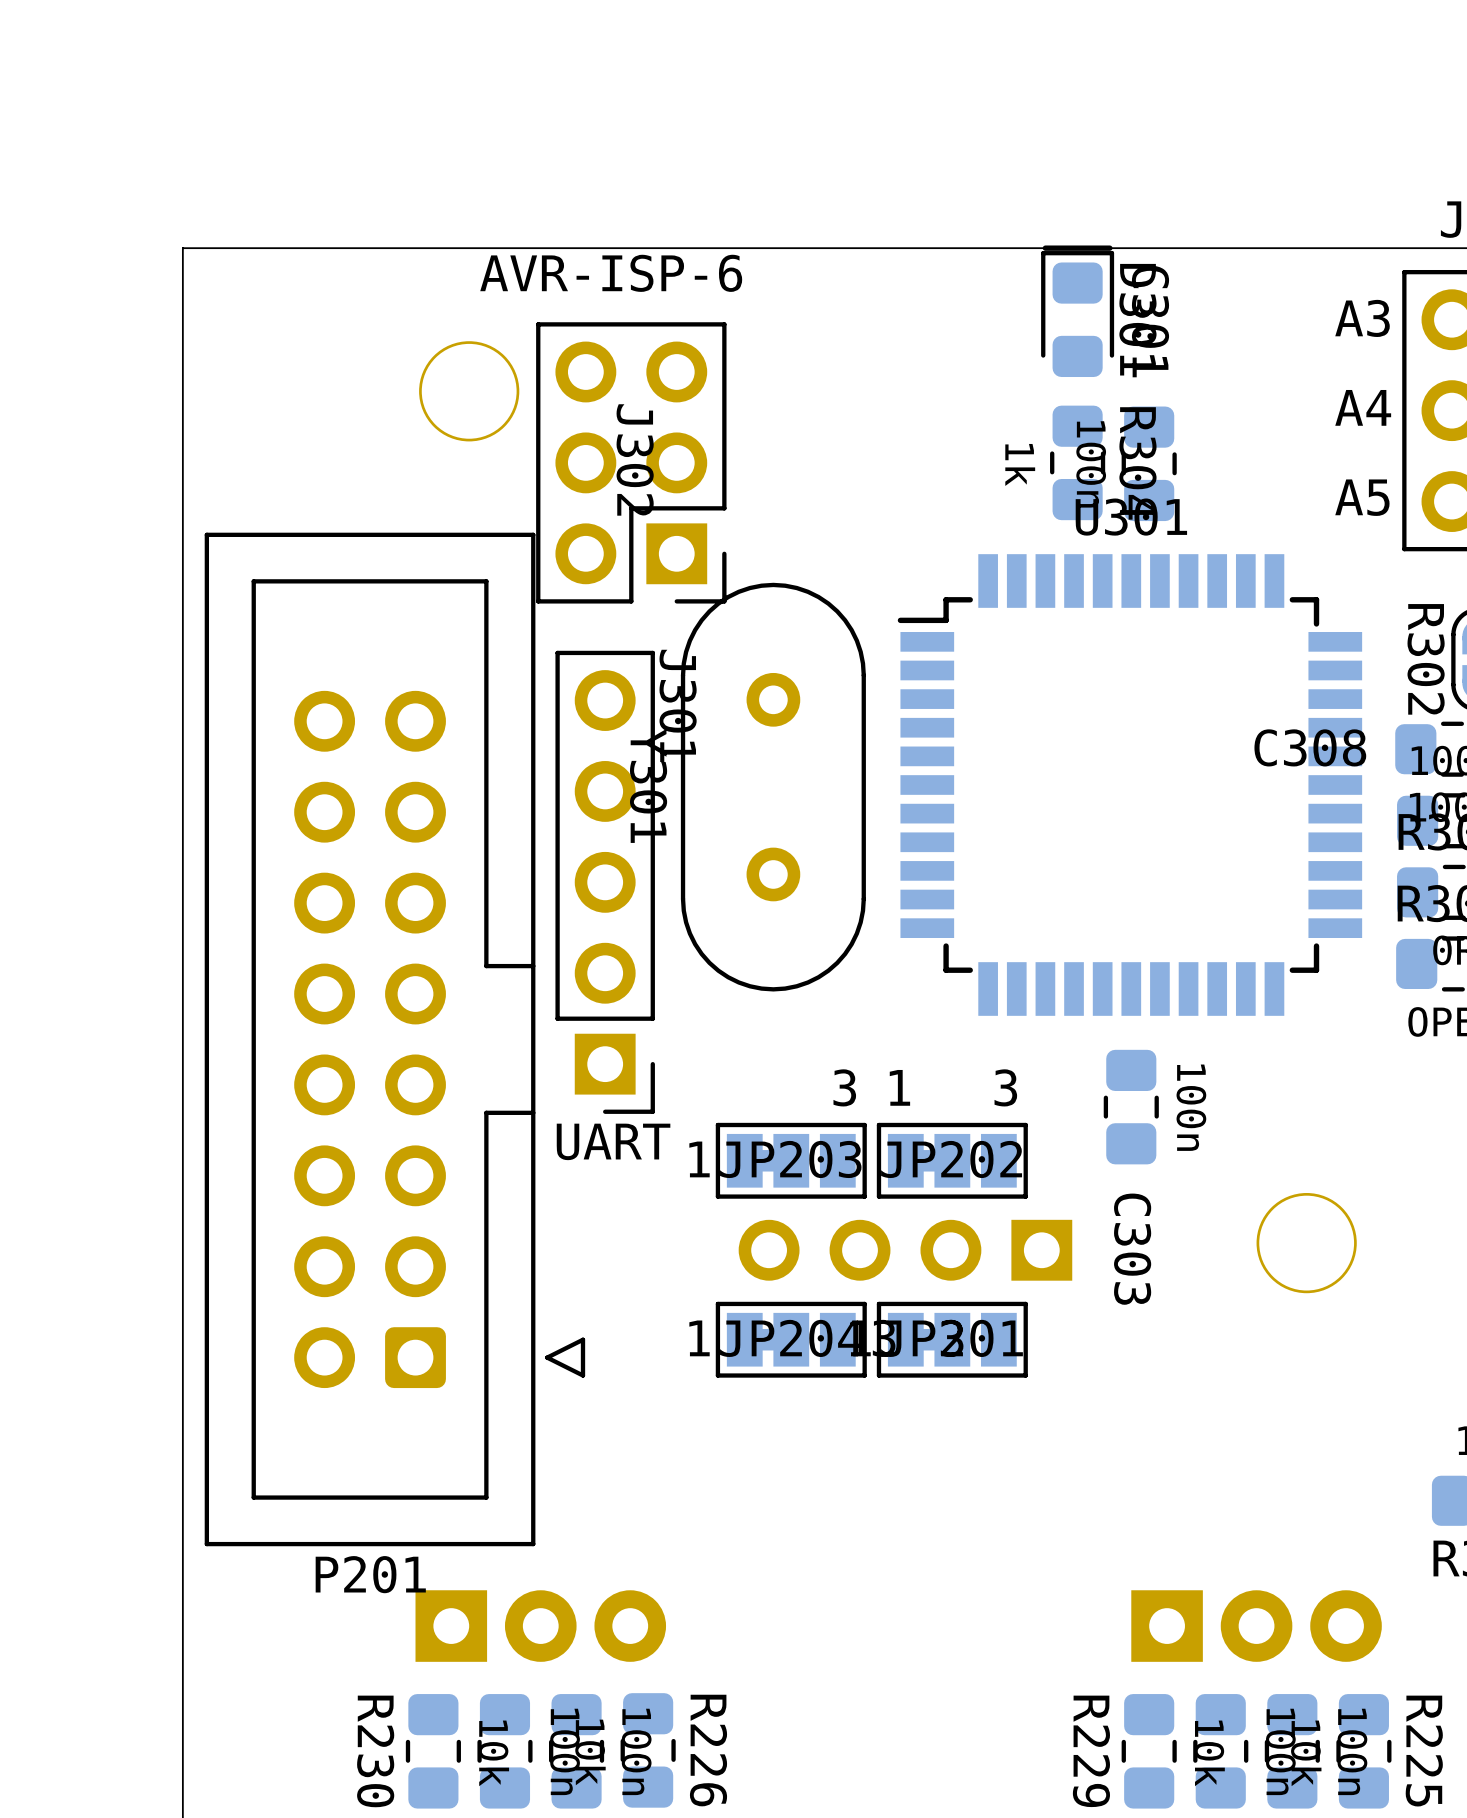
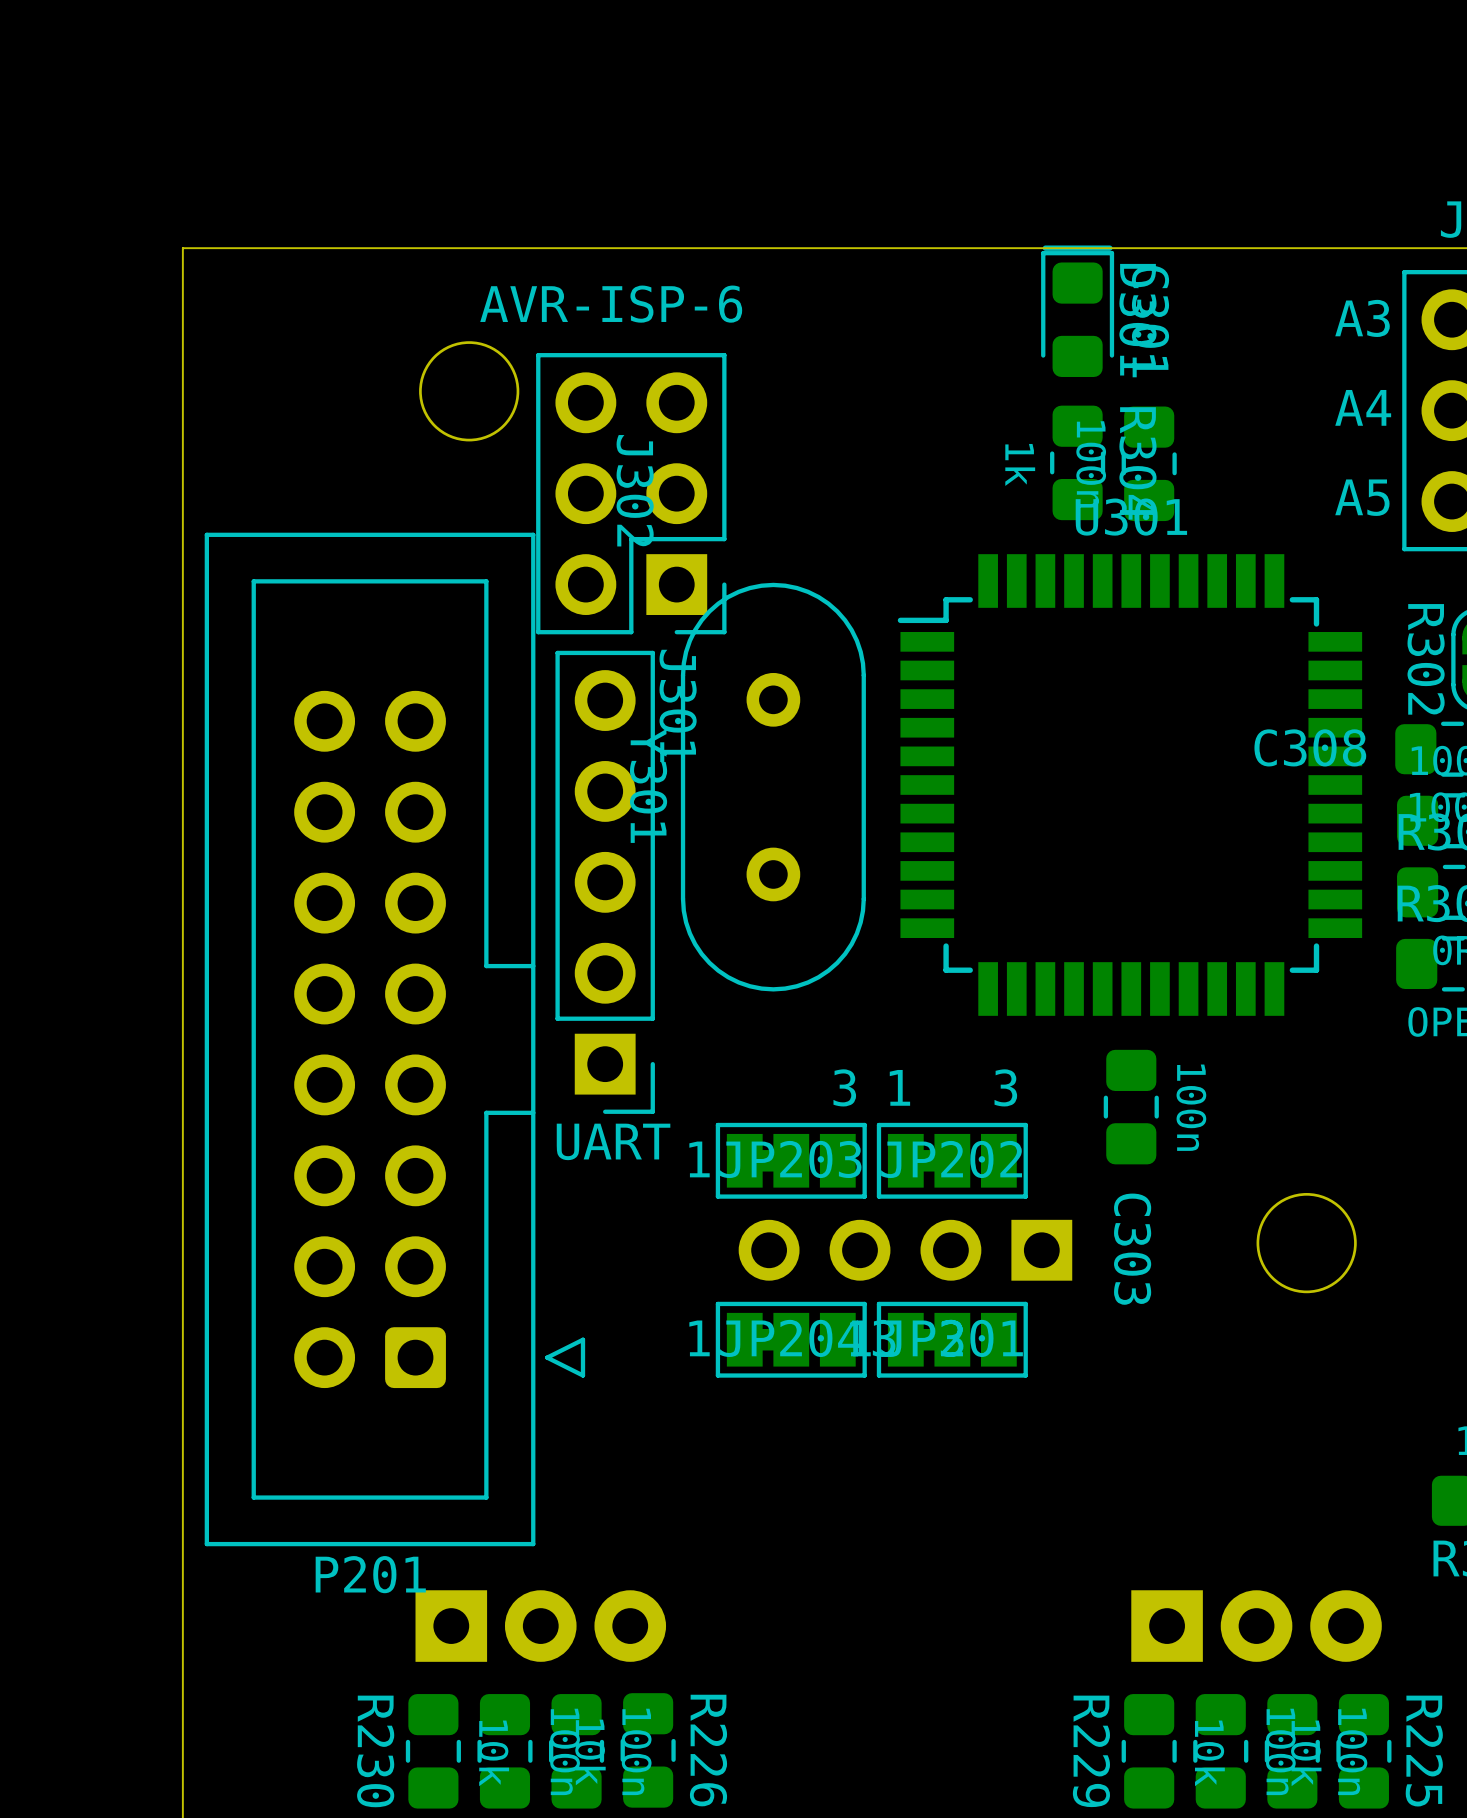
J302 position: (631, 462) -> (631, 493)

